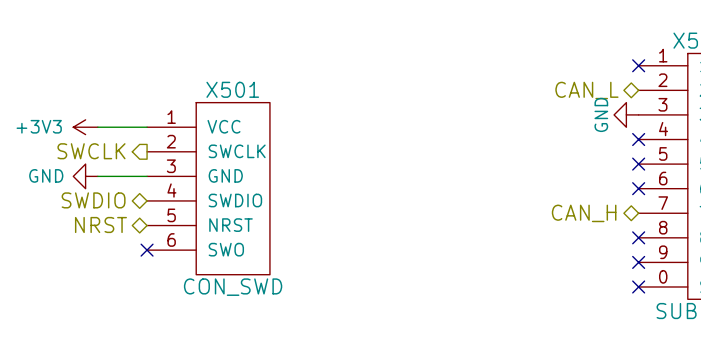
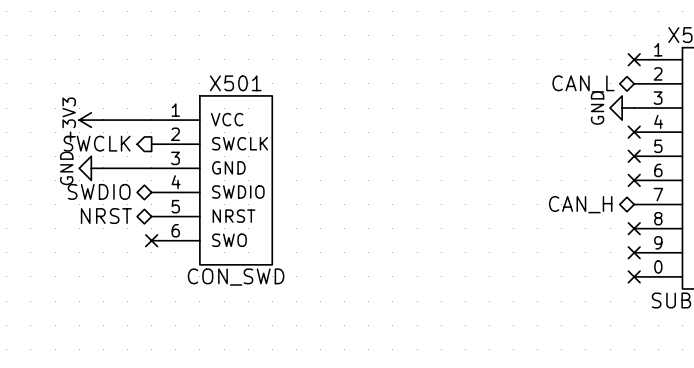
power symbol text rotation: 0° (39, 126) -> 90° counterclockwise (69, 119)
power symbol text rotation: 0° (46, 175) -> 90° counterclockwise (66, 168)

